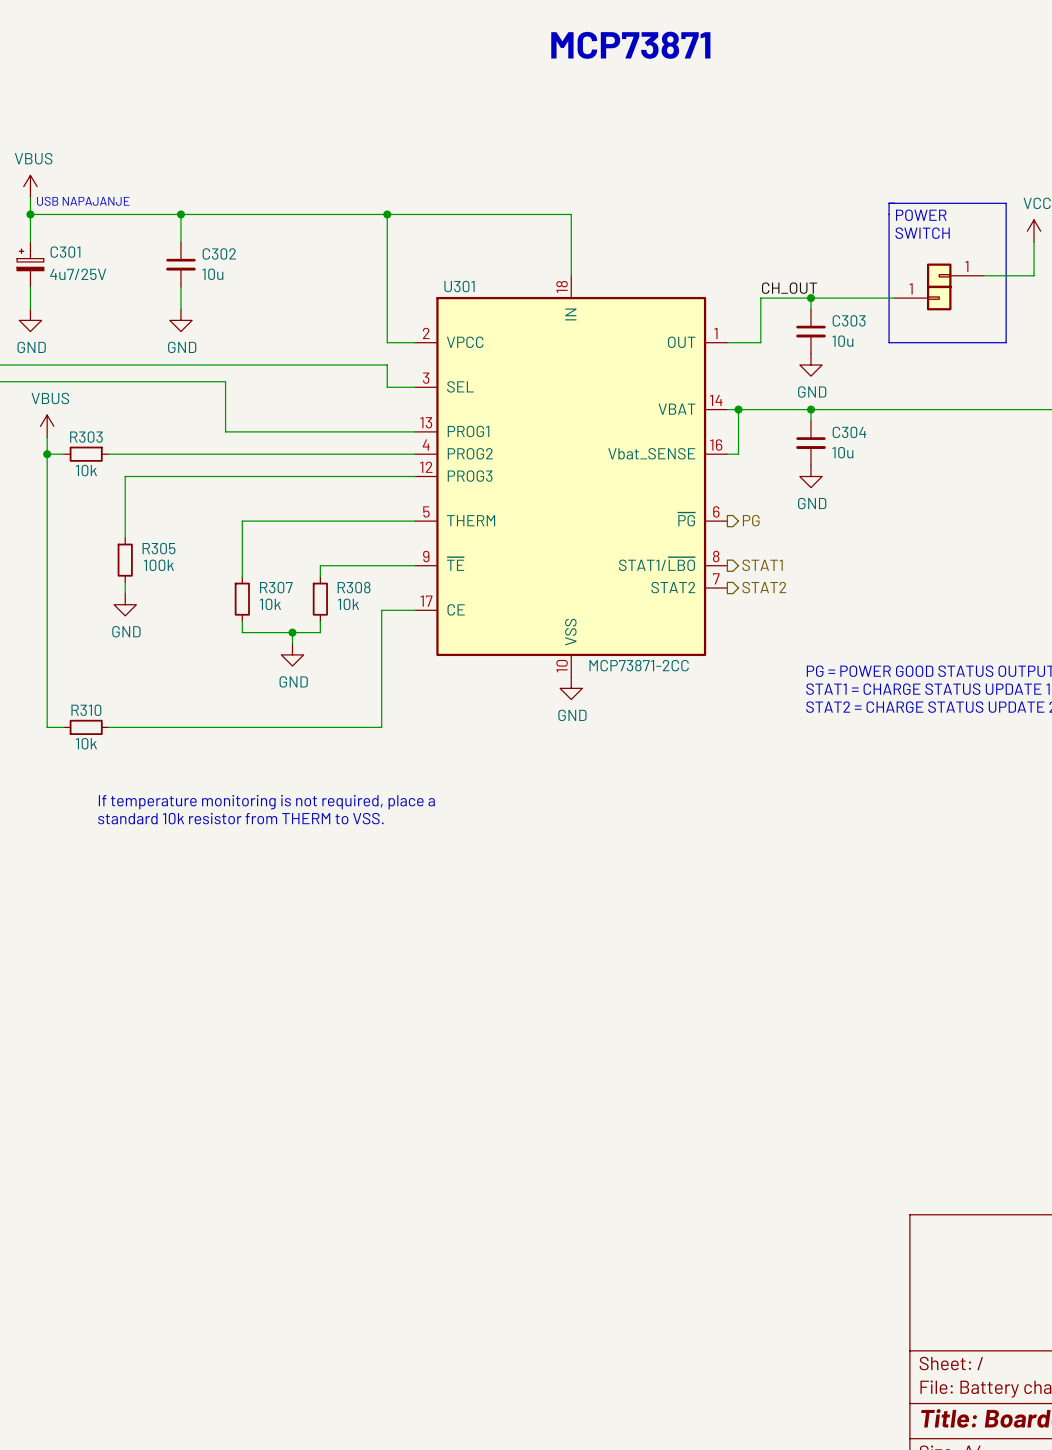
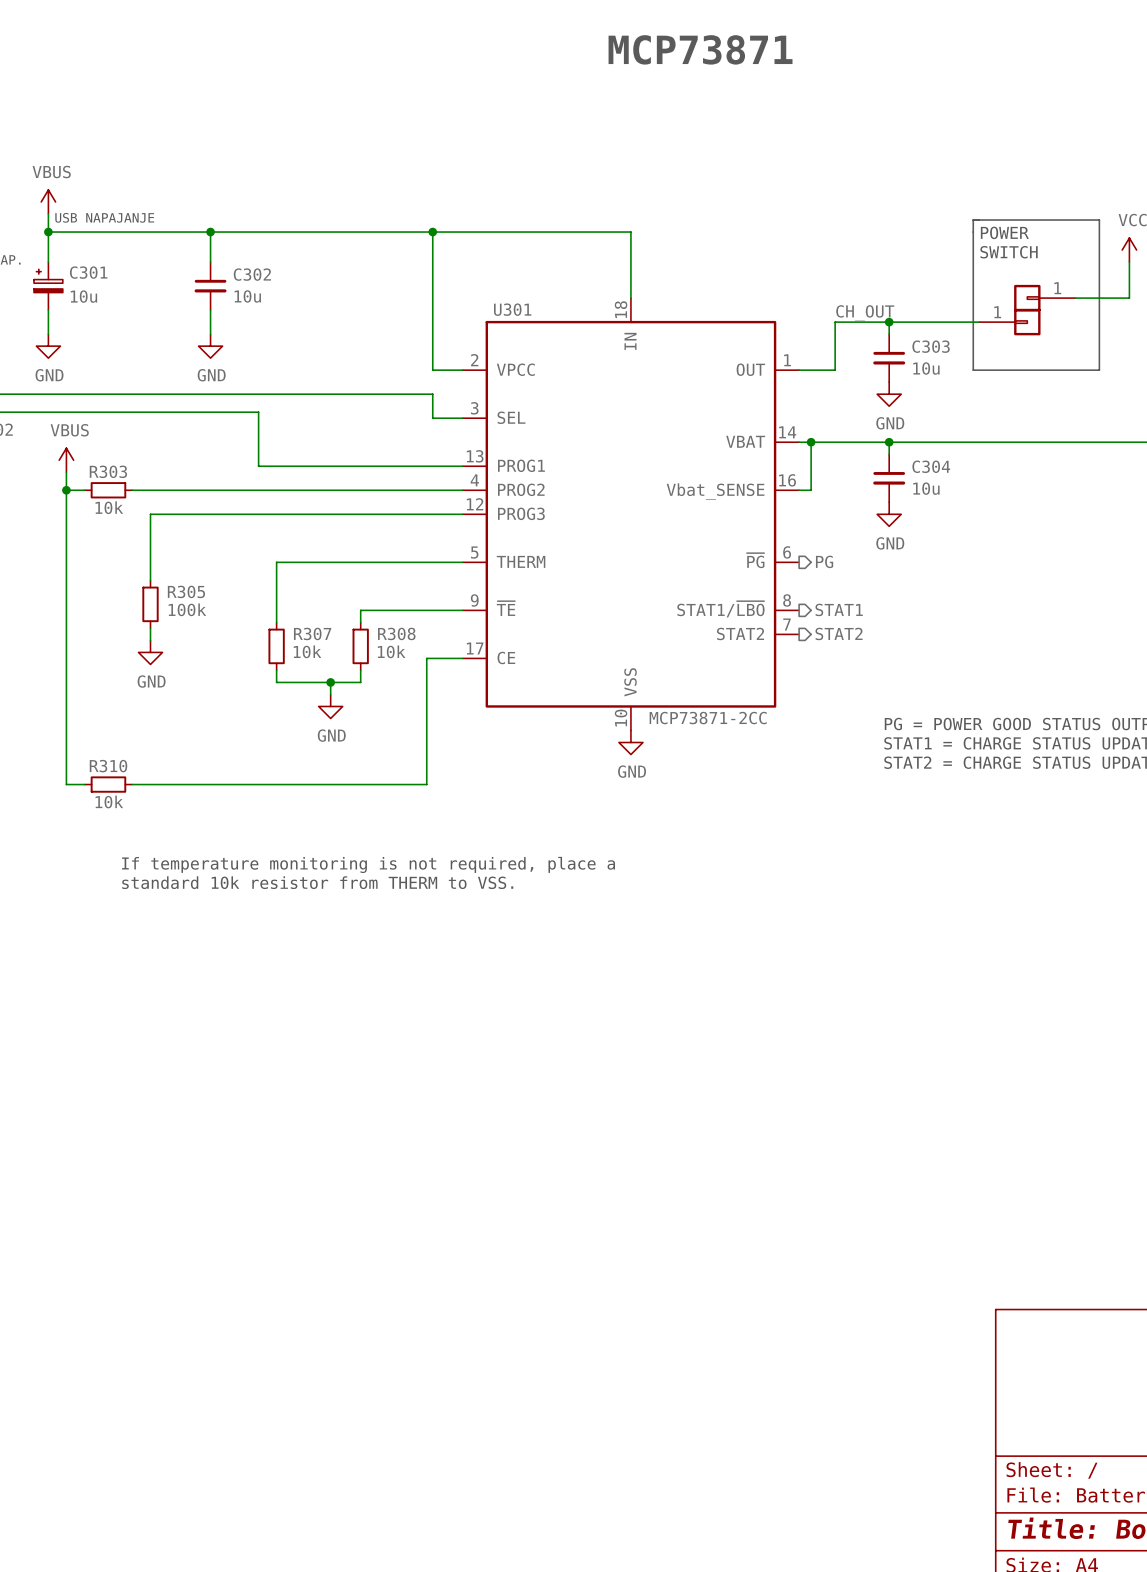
C301 value: 4u7/25V (78, 274) -> 10u (83, 296)

